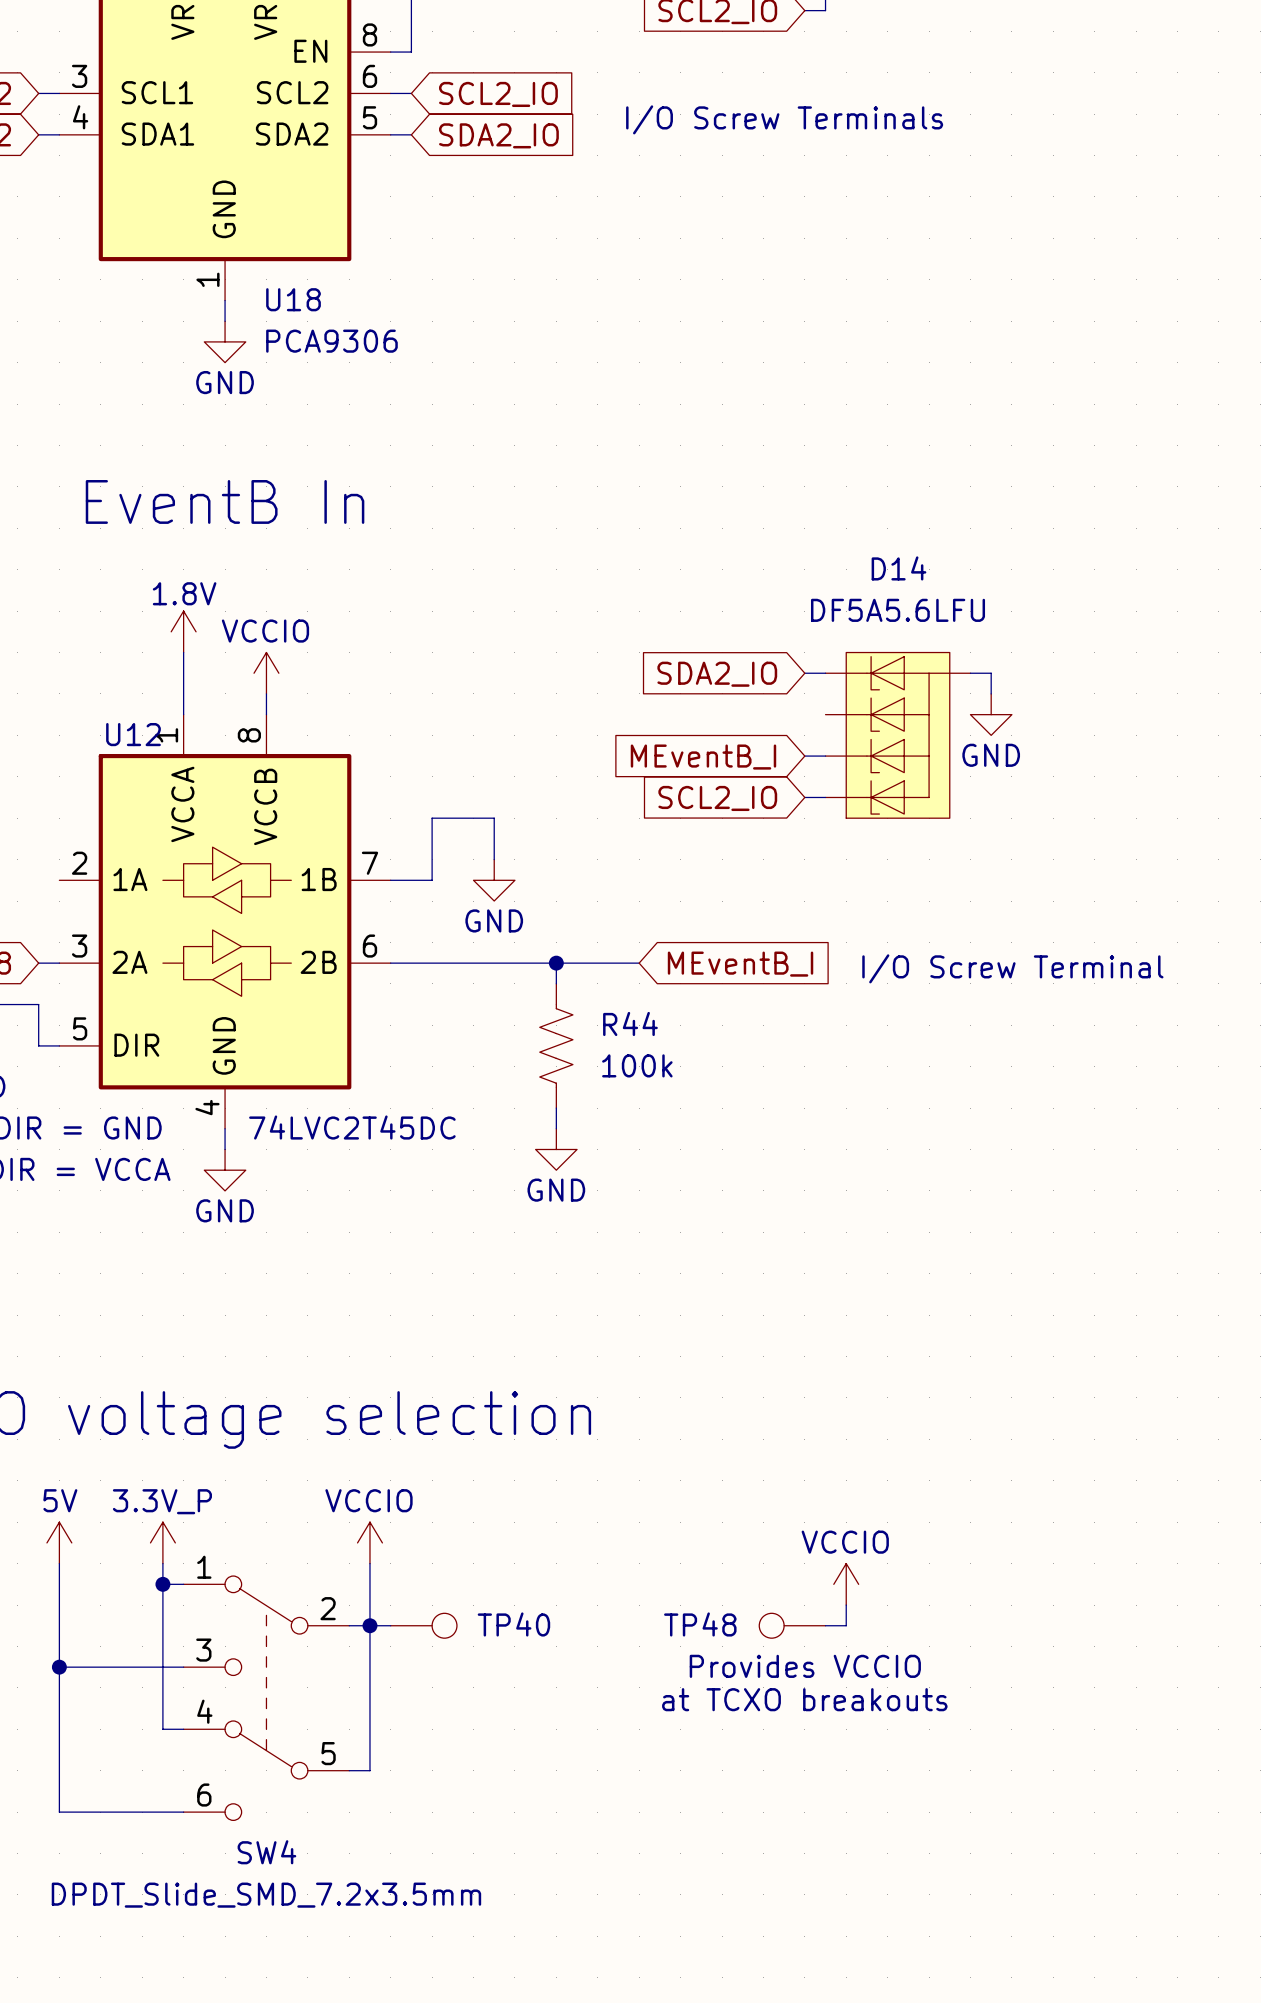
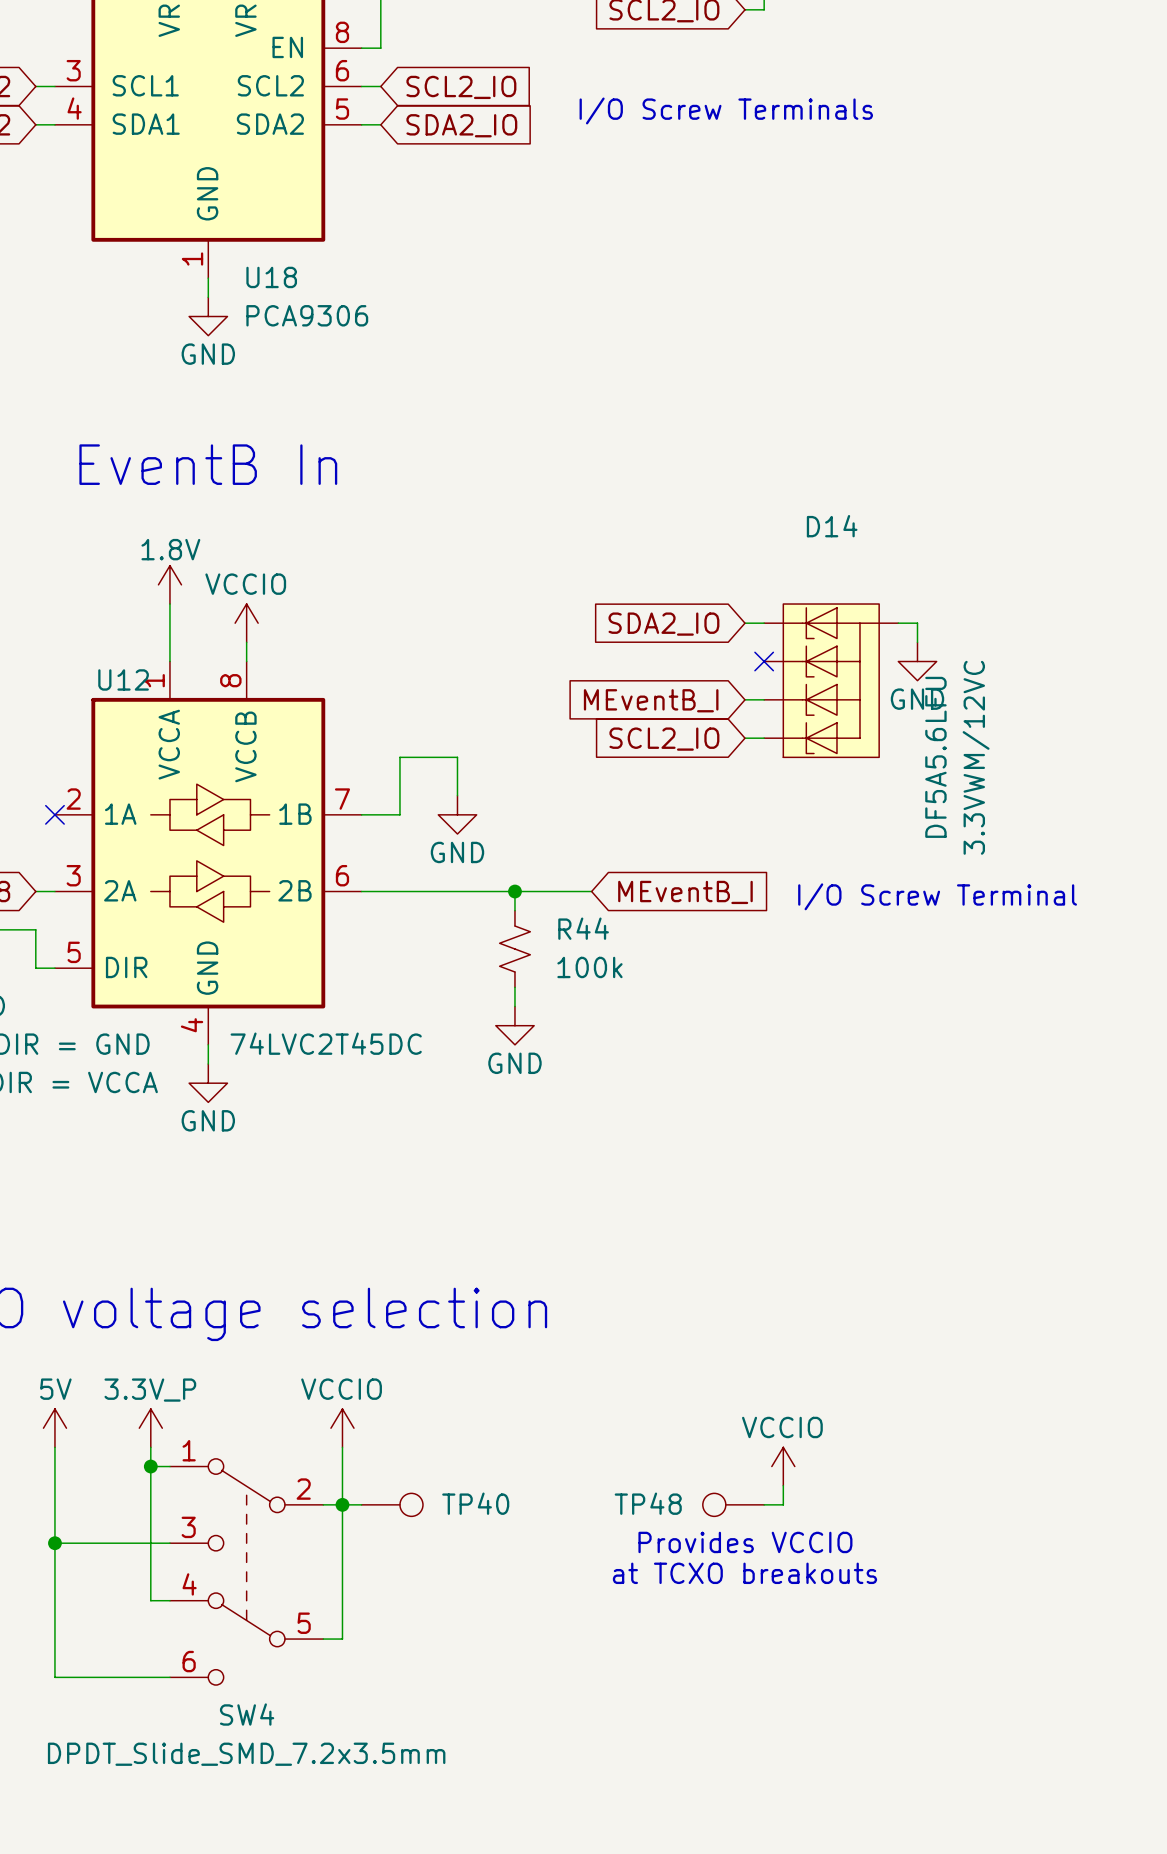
D14 value rotation: 0° (898, 610) -> 90° counterclockwise (935, 757)
D14 value position: DF5A5.6LFU (898, 610) -> DF5A5.6LFU (935, 757)
no-connect mark: none -> (764, 661)
D14 text: none -> 3.3VWM/12VC (976, 757)
no-connect mark: none -> (54, 814)
R44 symbol: [539, 983, 573, 1109] -> [499, 910, 531, 988]
wire: (556, 1108) (556, 1128) -> (514, 987) (514, 1006)
power symbol position: GND (556, 1149) -> GND (514, 1025)

